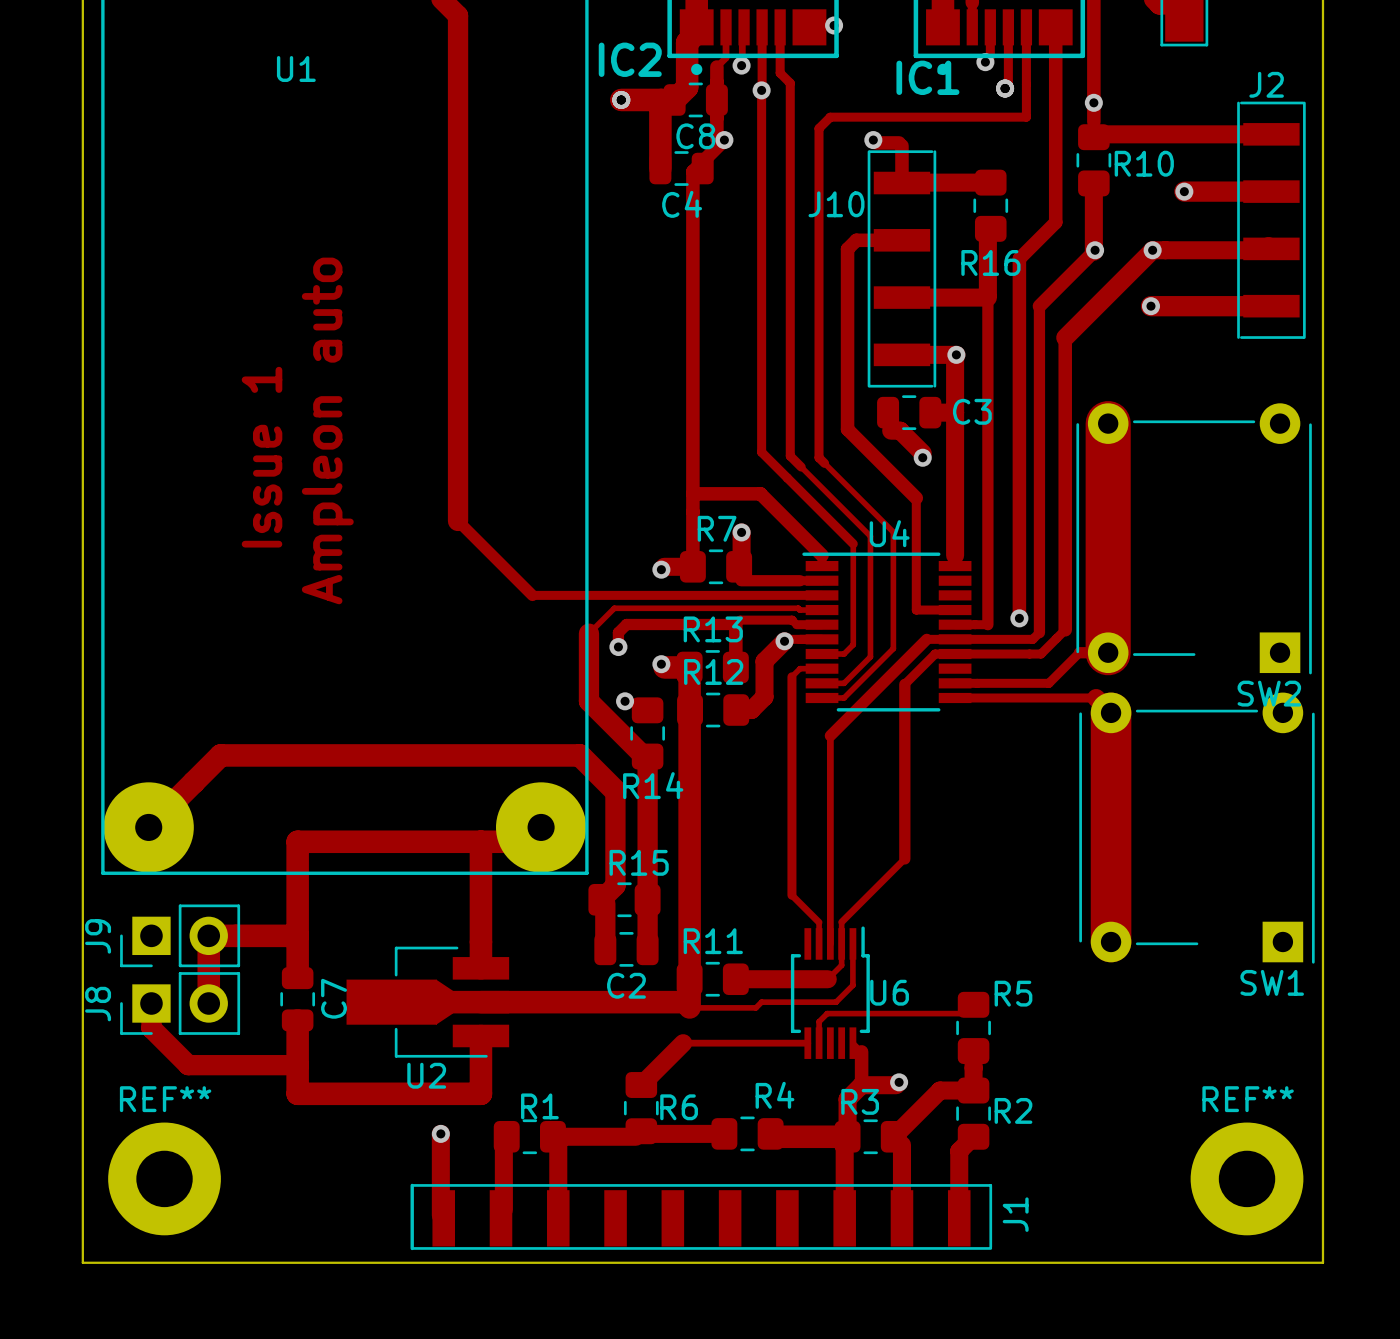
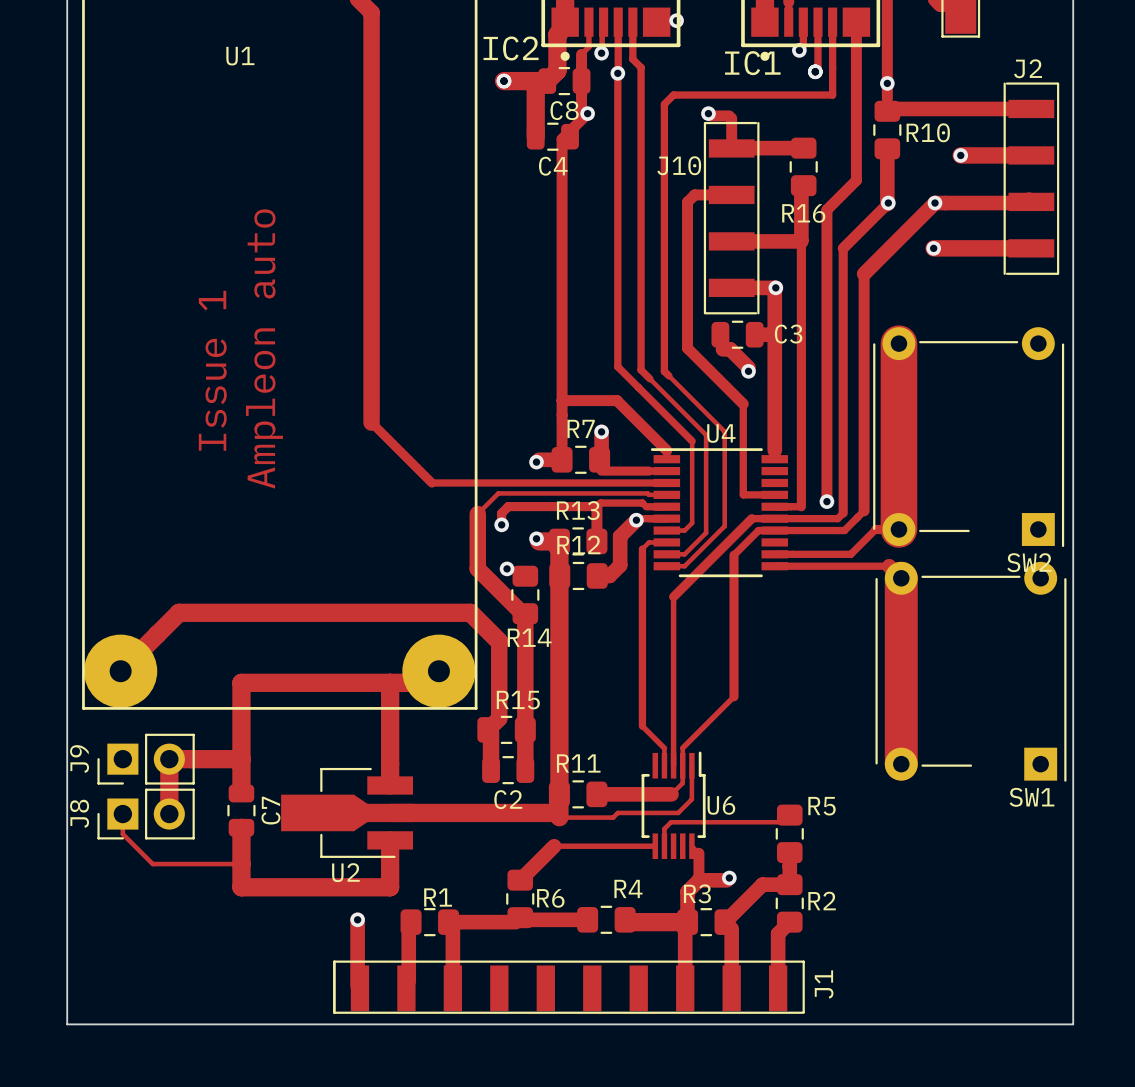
track width: thick (151, 1003) (151, 1028) (188, 1065) (297, 1065) -> thin (122, 814) (122, 834) (152, 864) (241, 864)
REF**: (164, 1178) -> none
REF**: (1247, 1178) -> none

